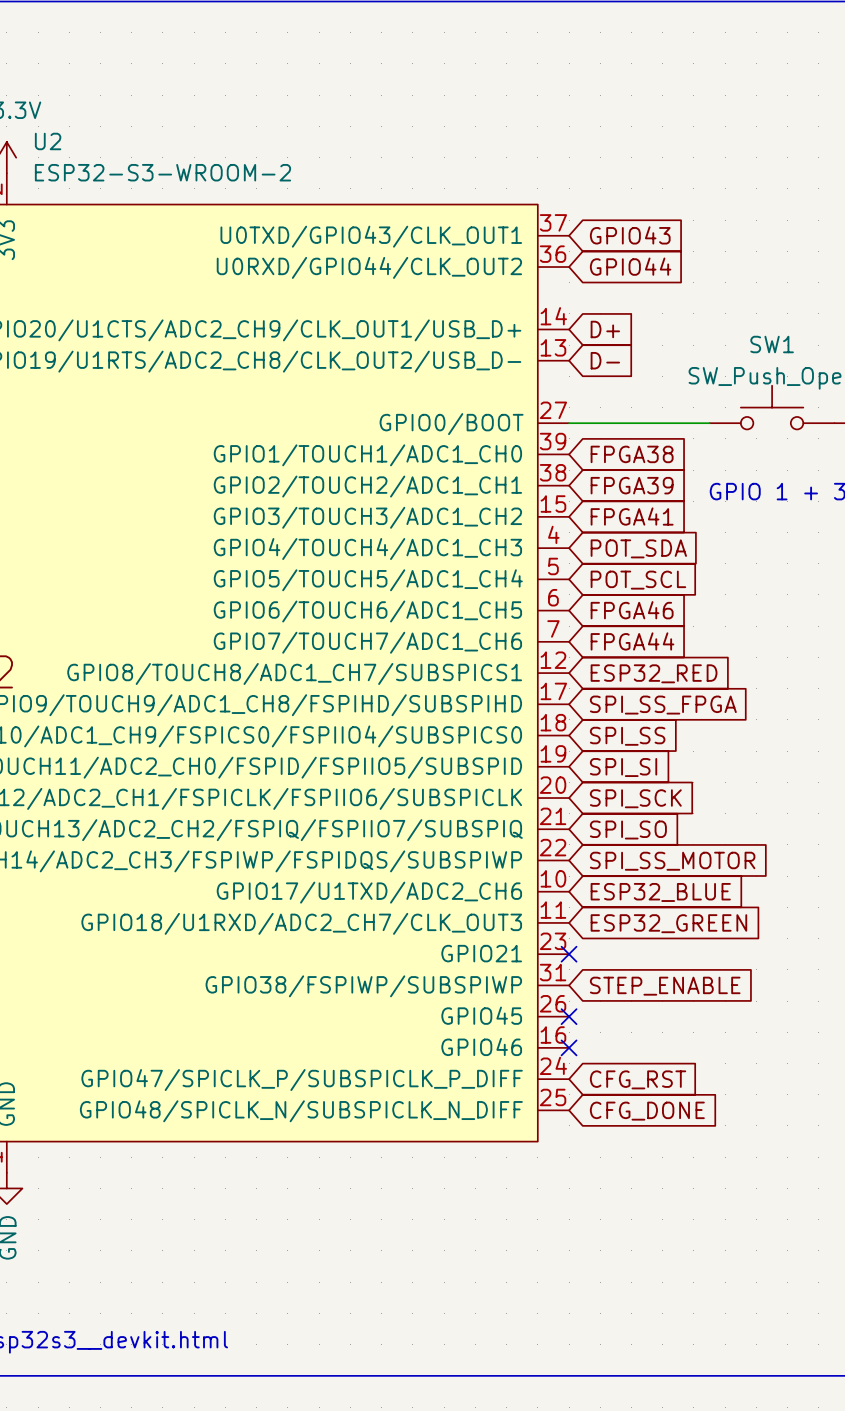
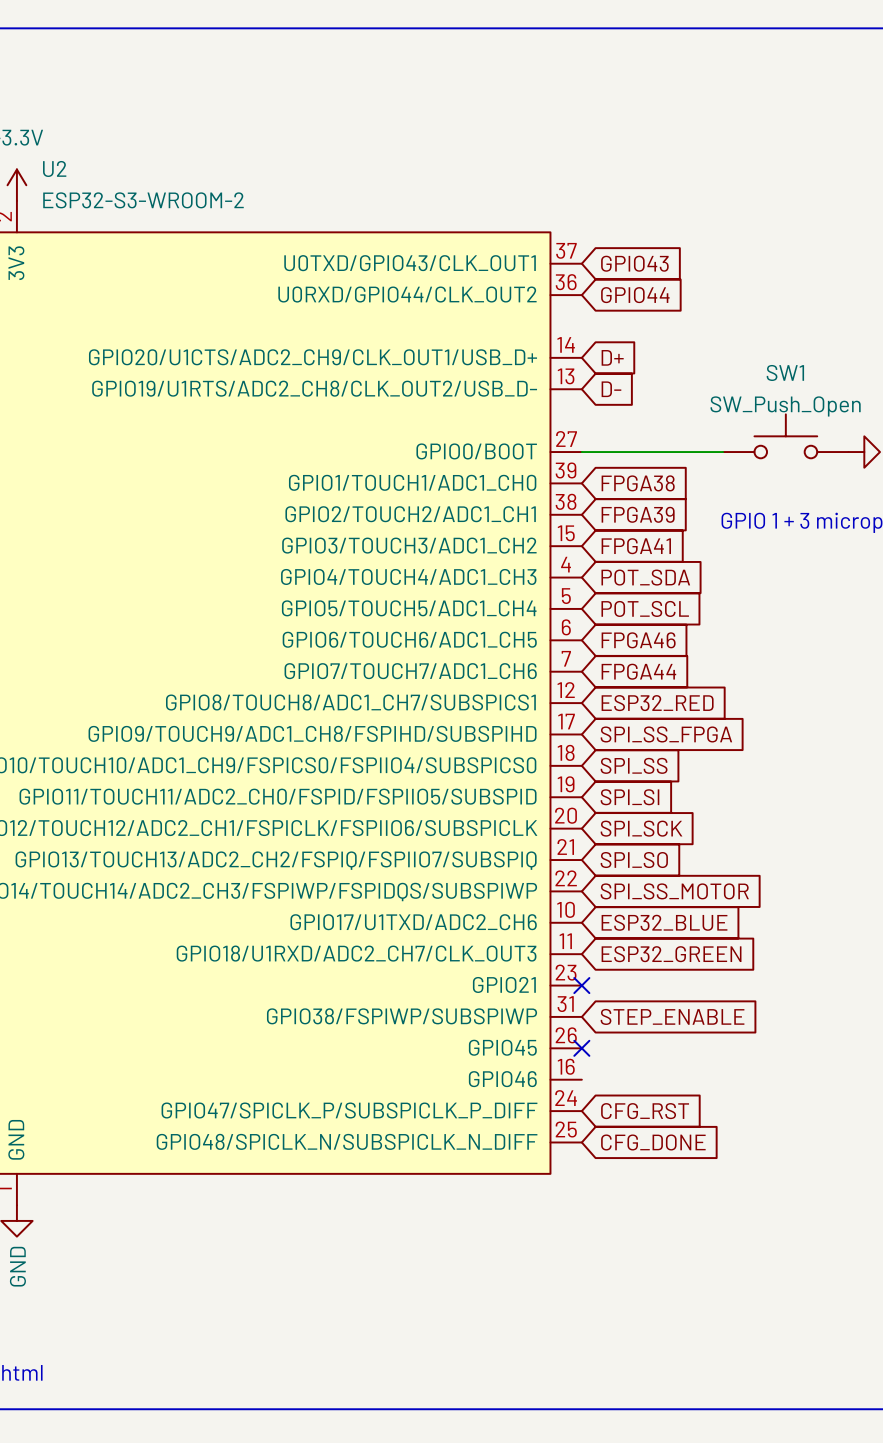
no-connect mark: (569, 1047) -> none

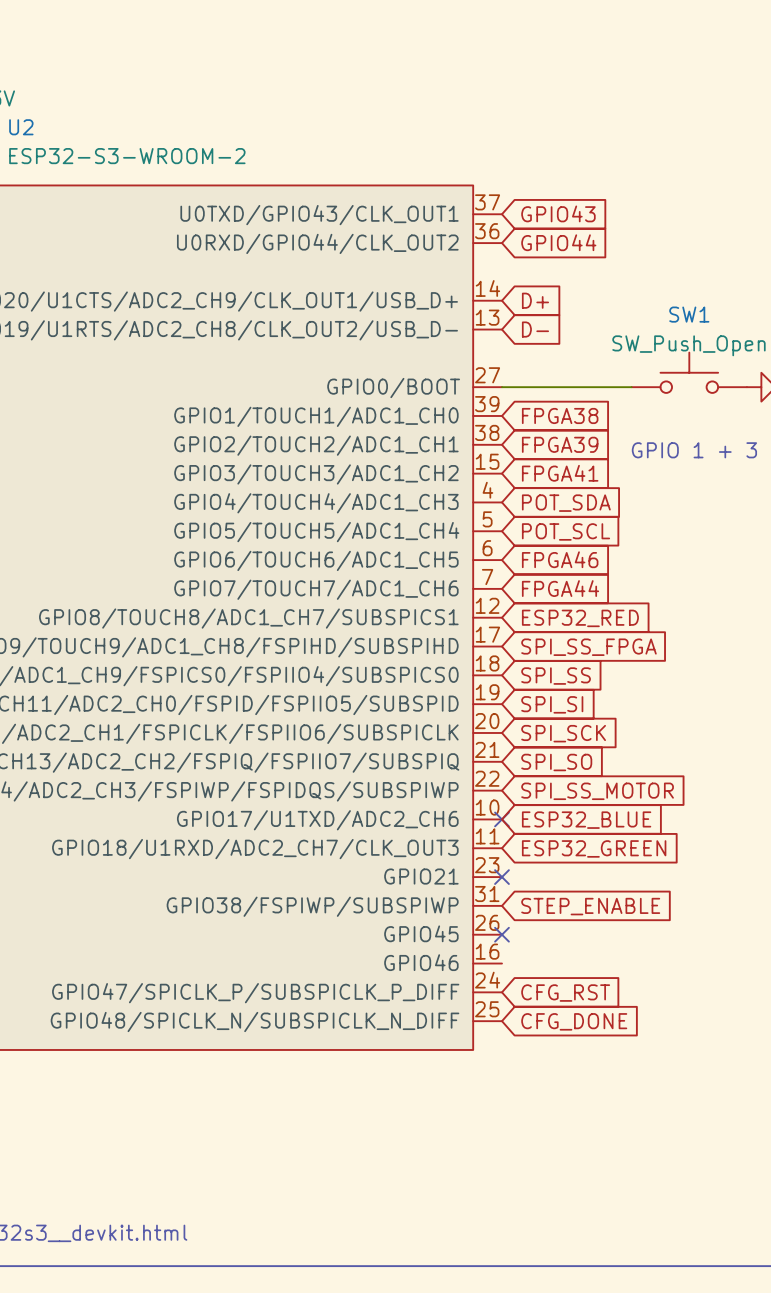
no-connect mark: none -> (501, 819)

